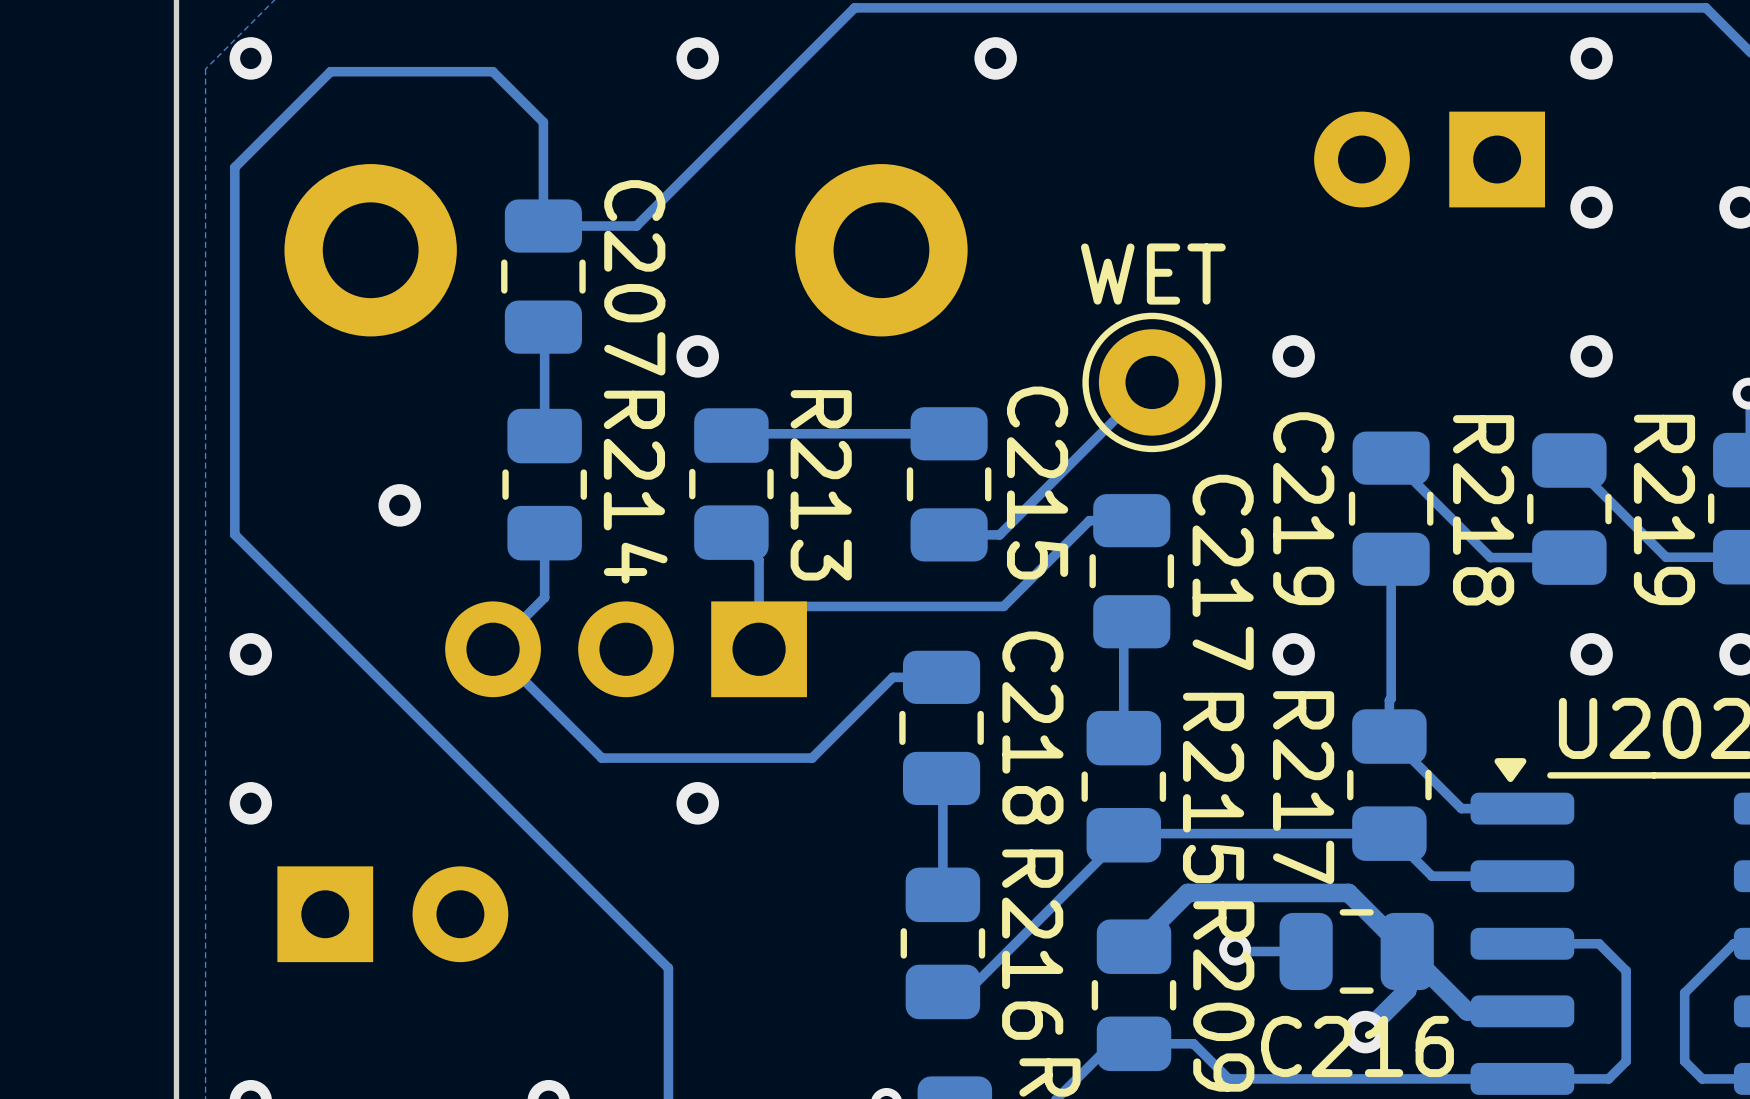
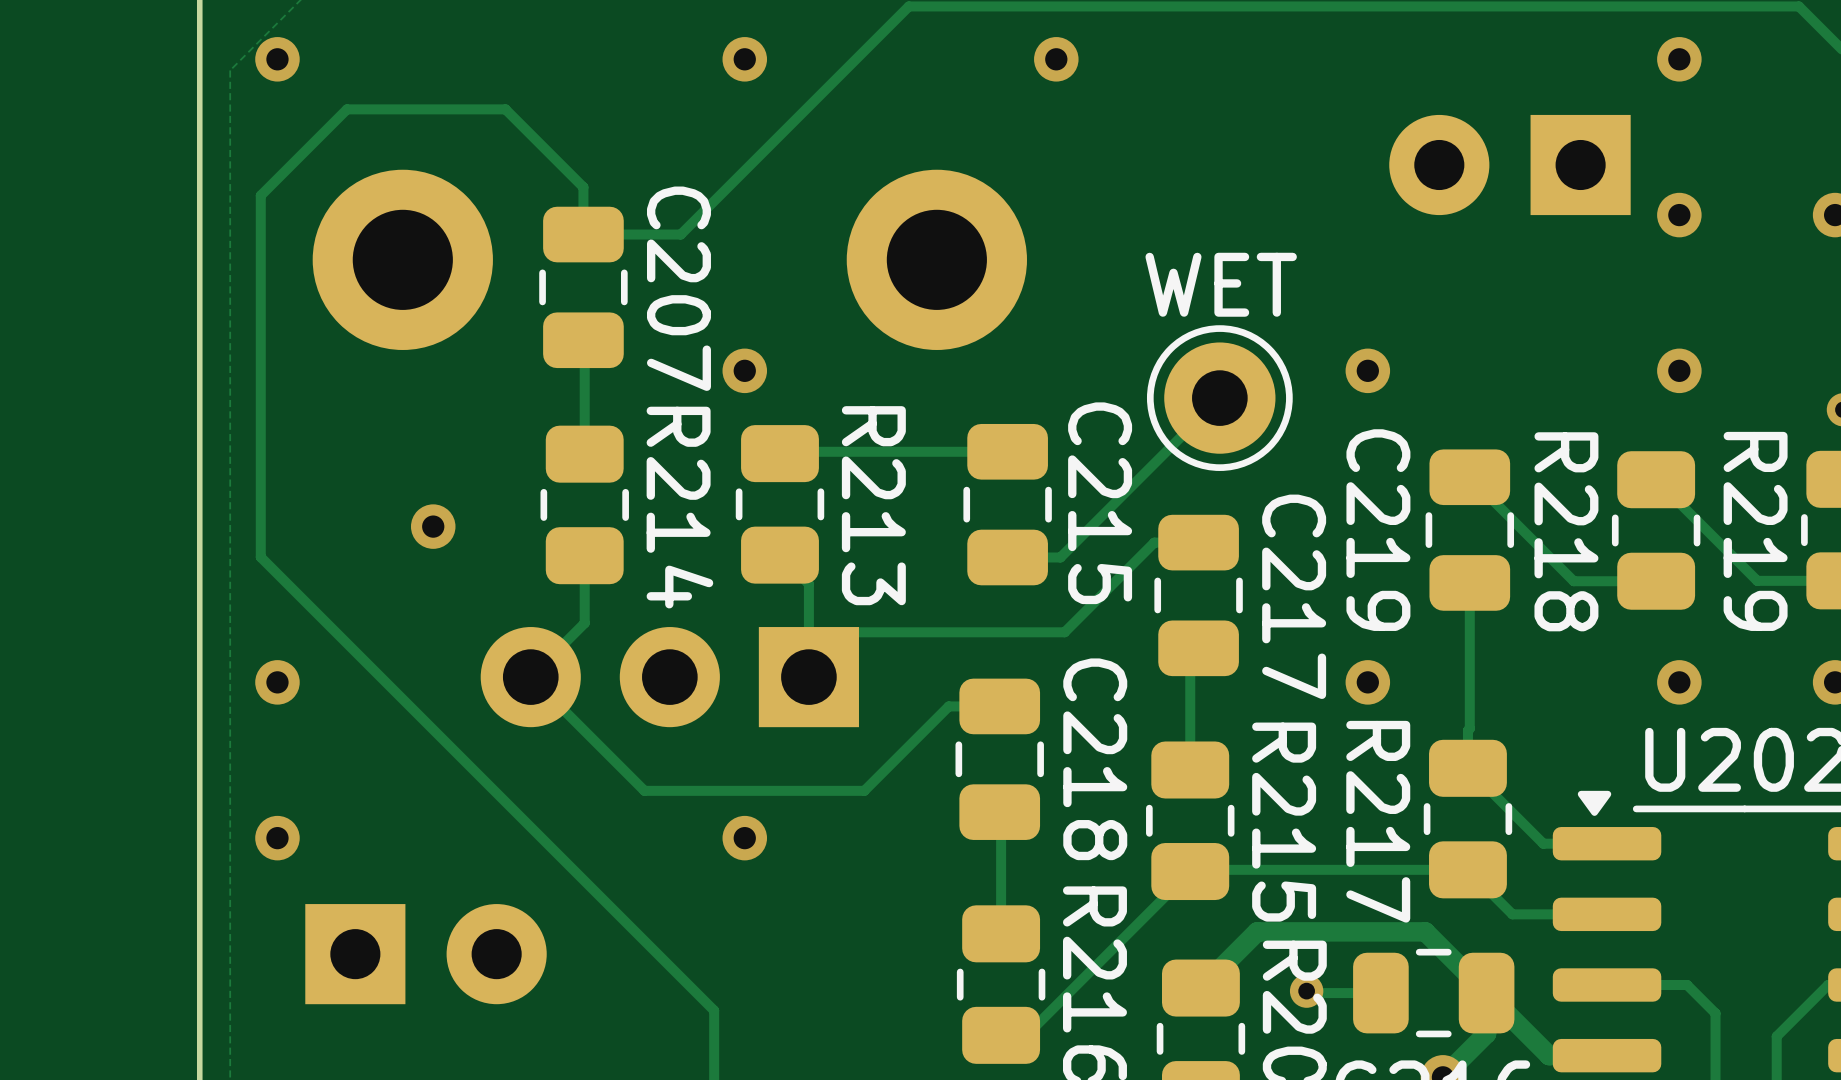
track: (543, 180) (543, 122) (492, 71) (330, 71) (234, 167) (234, 188) -> (583, 187) (505, 109) (347, 109) (260, 195)

